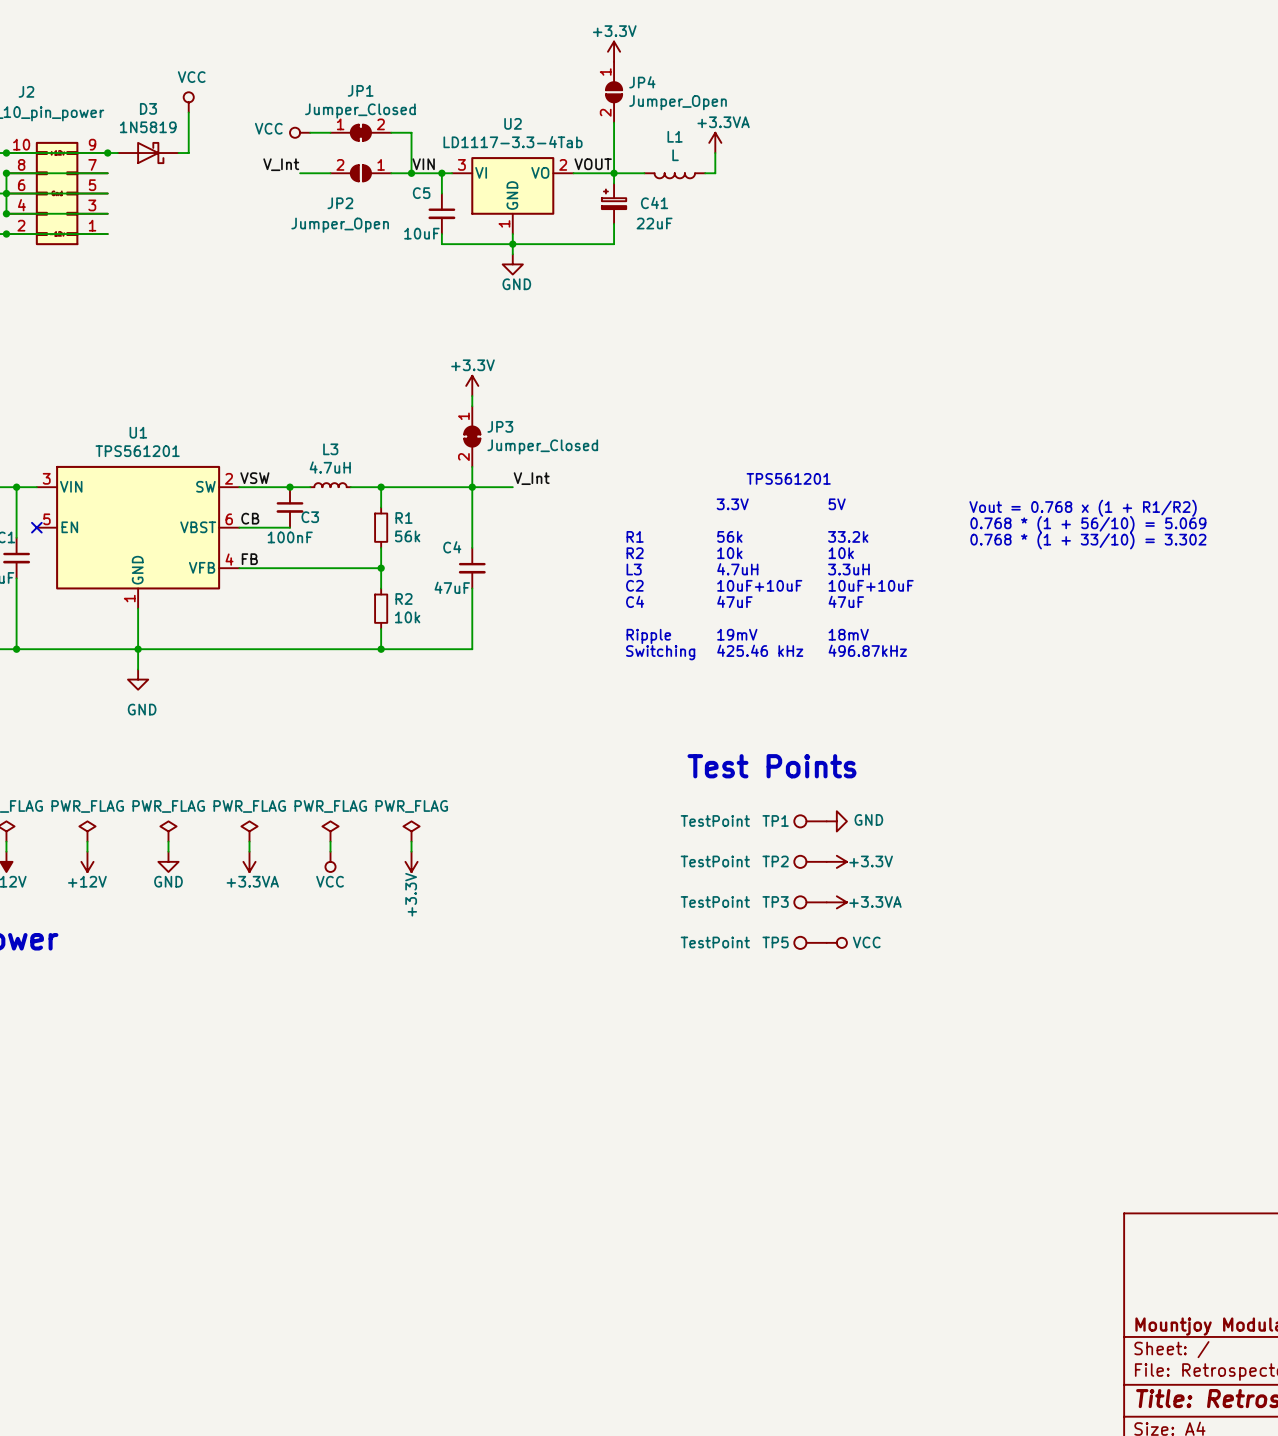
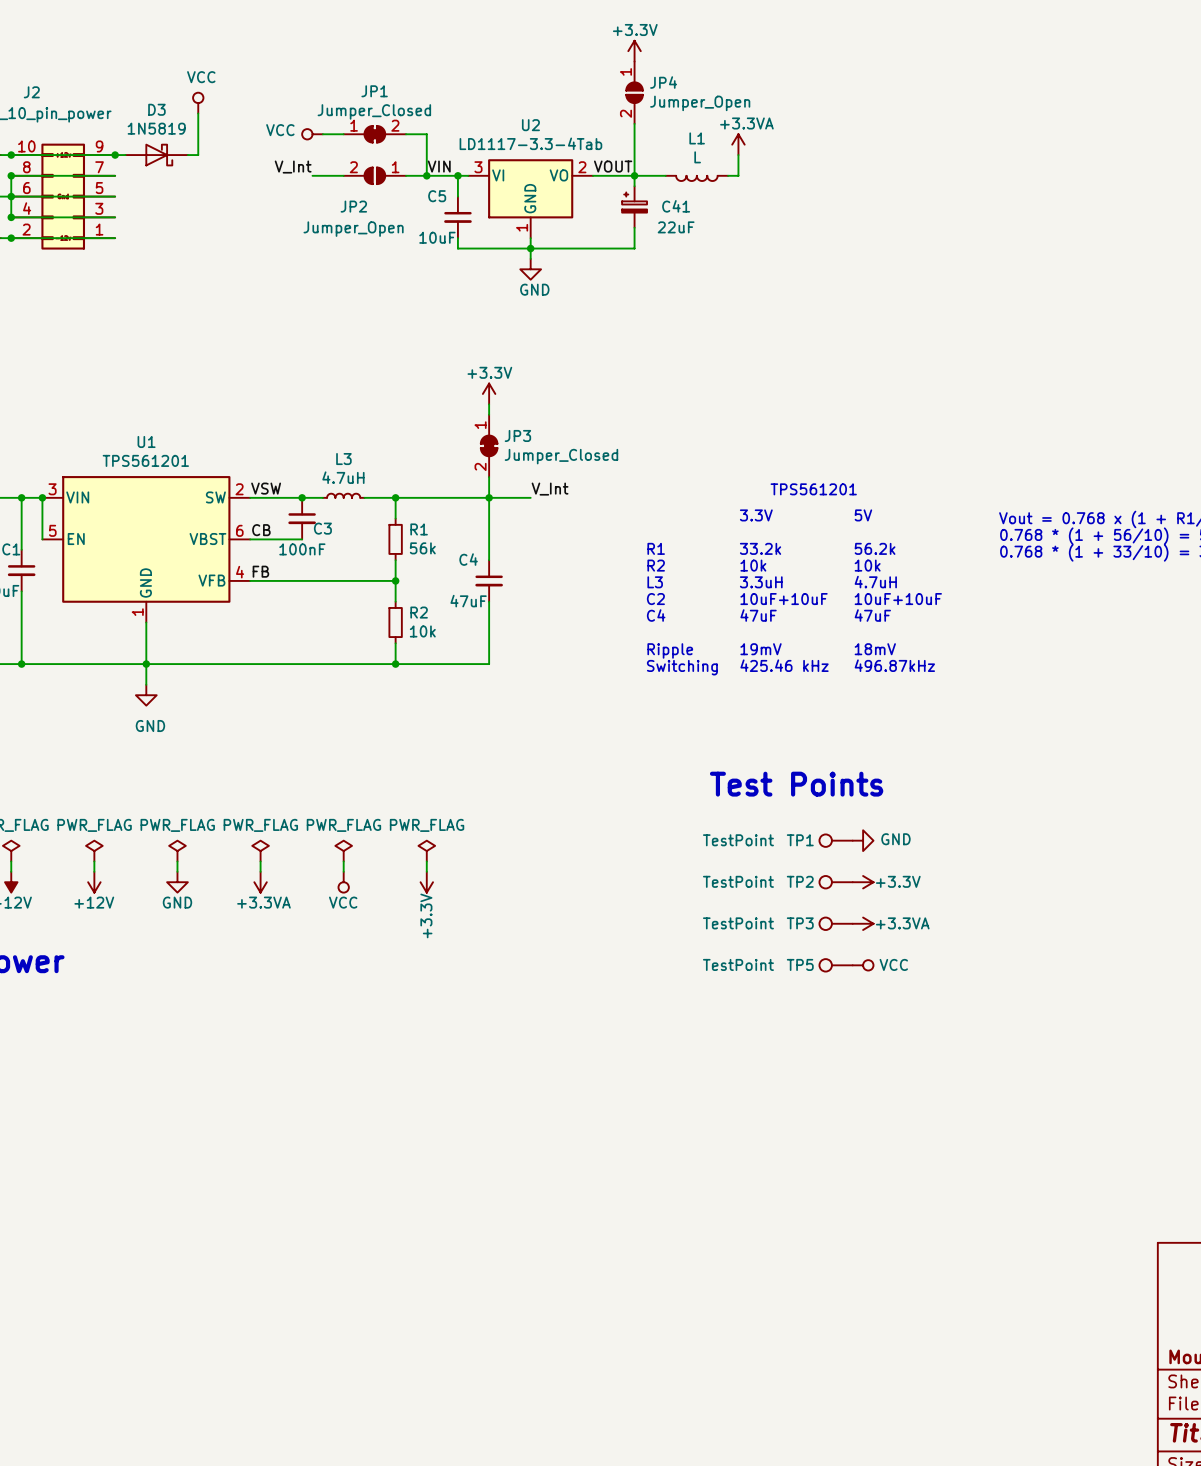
wire: none -> (42, 497) (42, 539)
junction: none -> (42, 497)
no-connect mark: (36, 527) -> none
text: 56k (729, 536) -> 33.2k (760, 548)
text: 33.2k (848, 536) -> 56.2k (875, 548)
text: 4.7uH (737, 569) -> 3.3uH (761, 582)
text: 3.3uH (848, 569) -> 4.7uH (875, 582)

